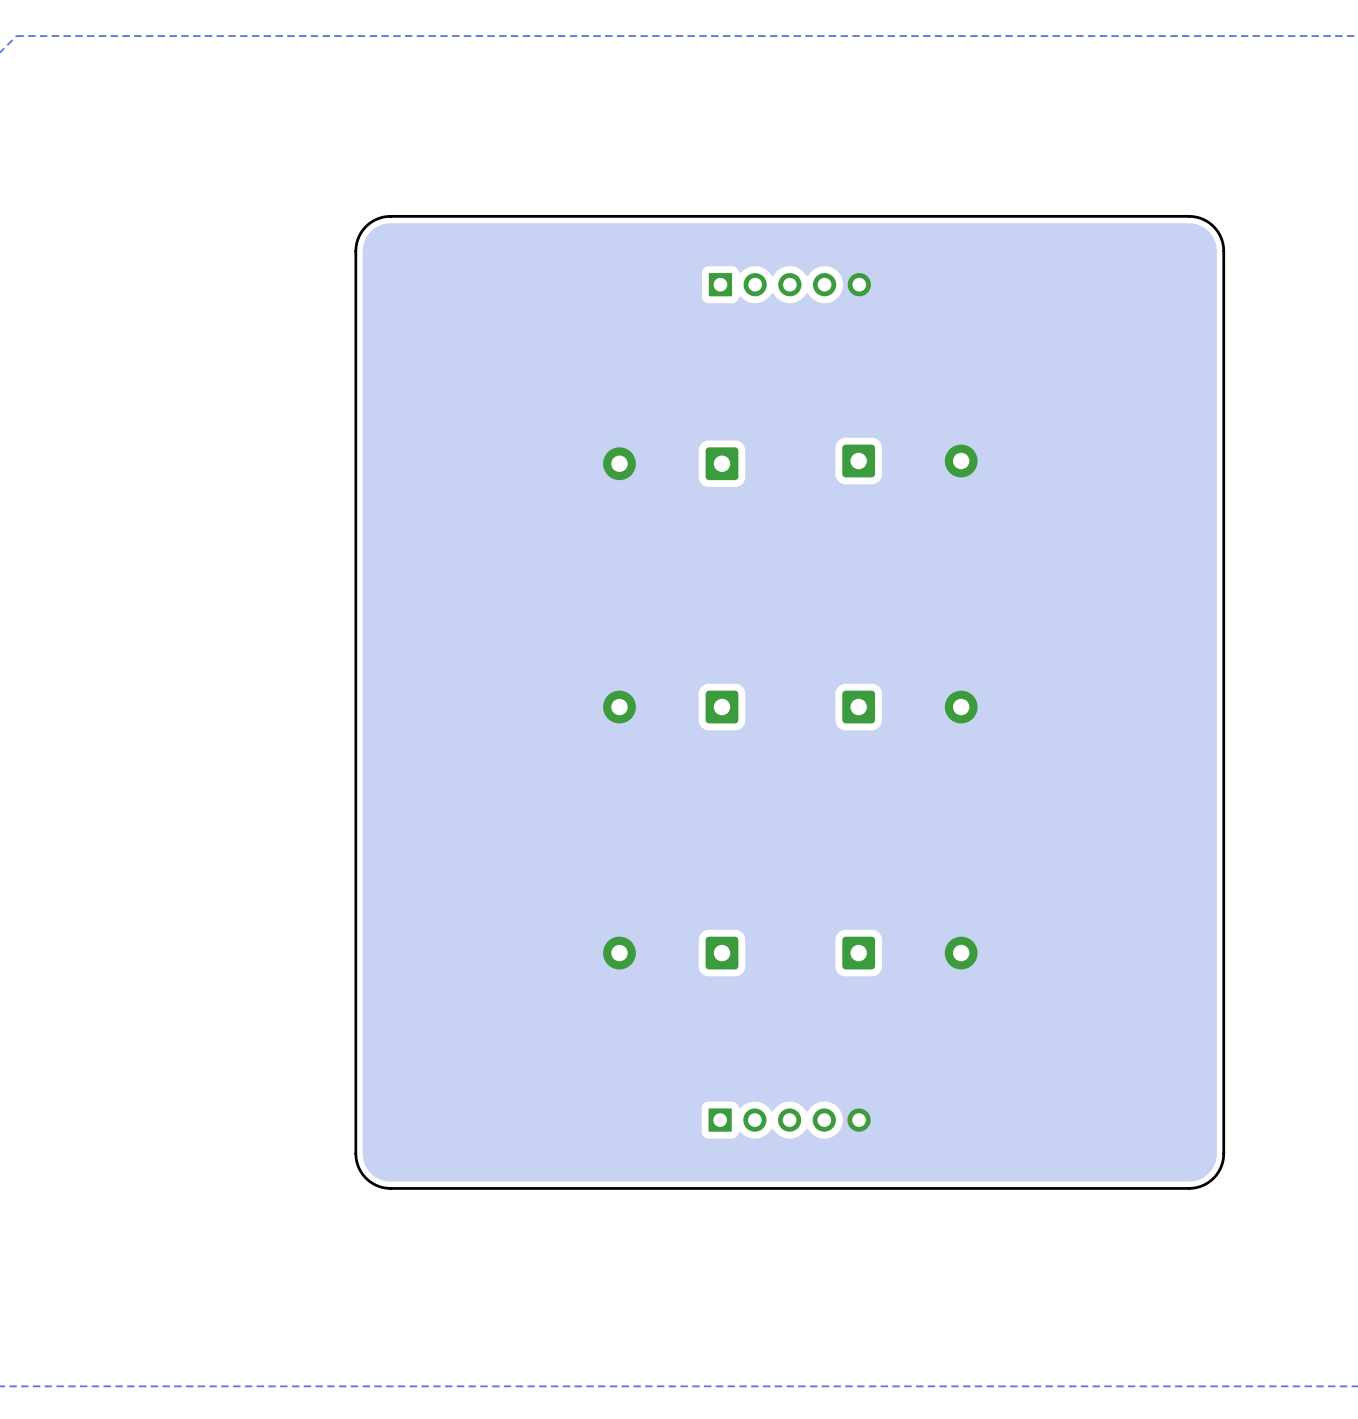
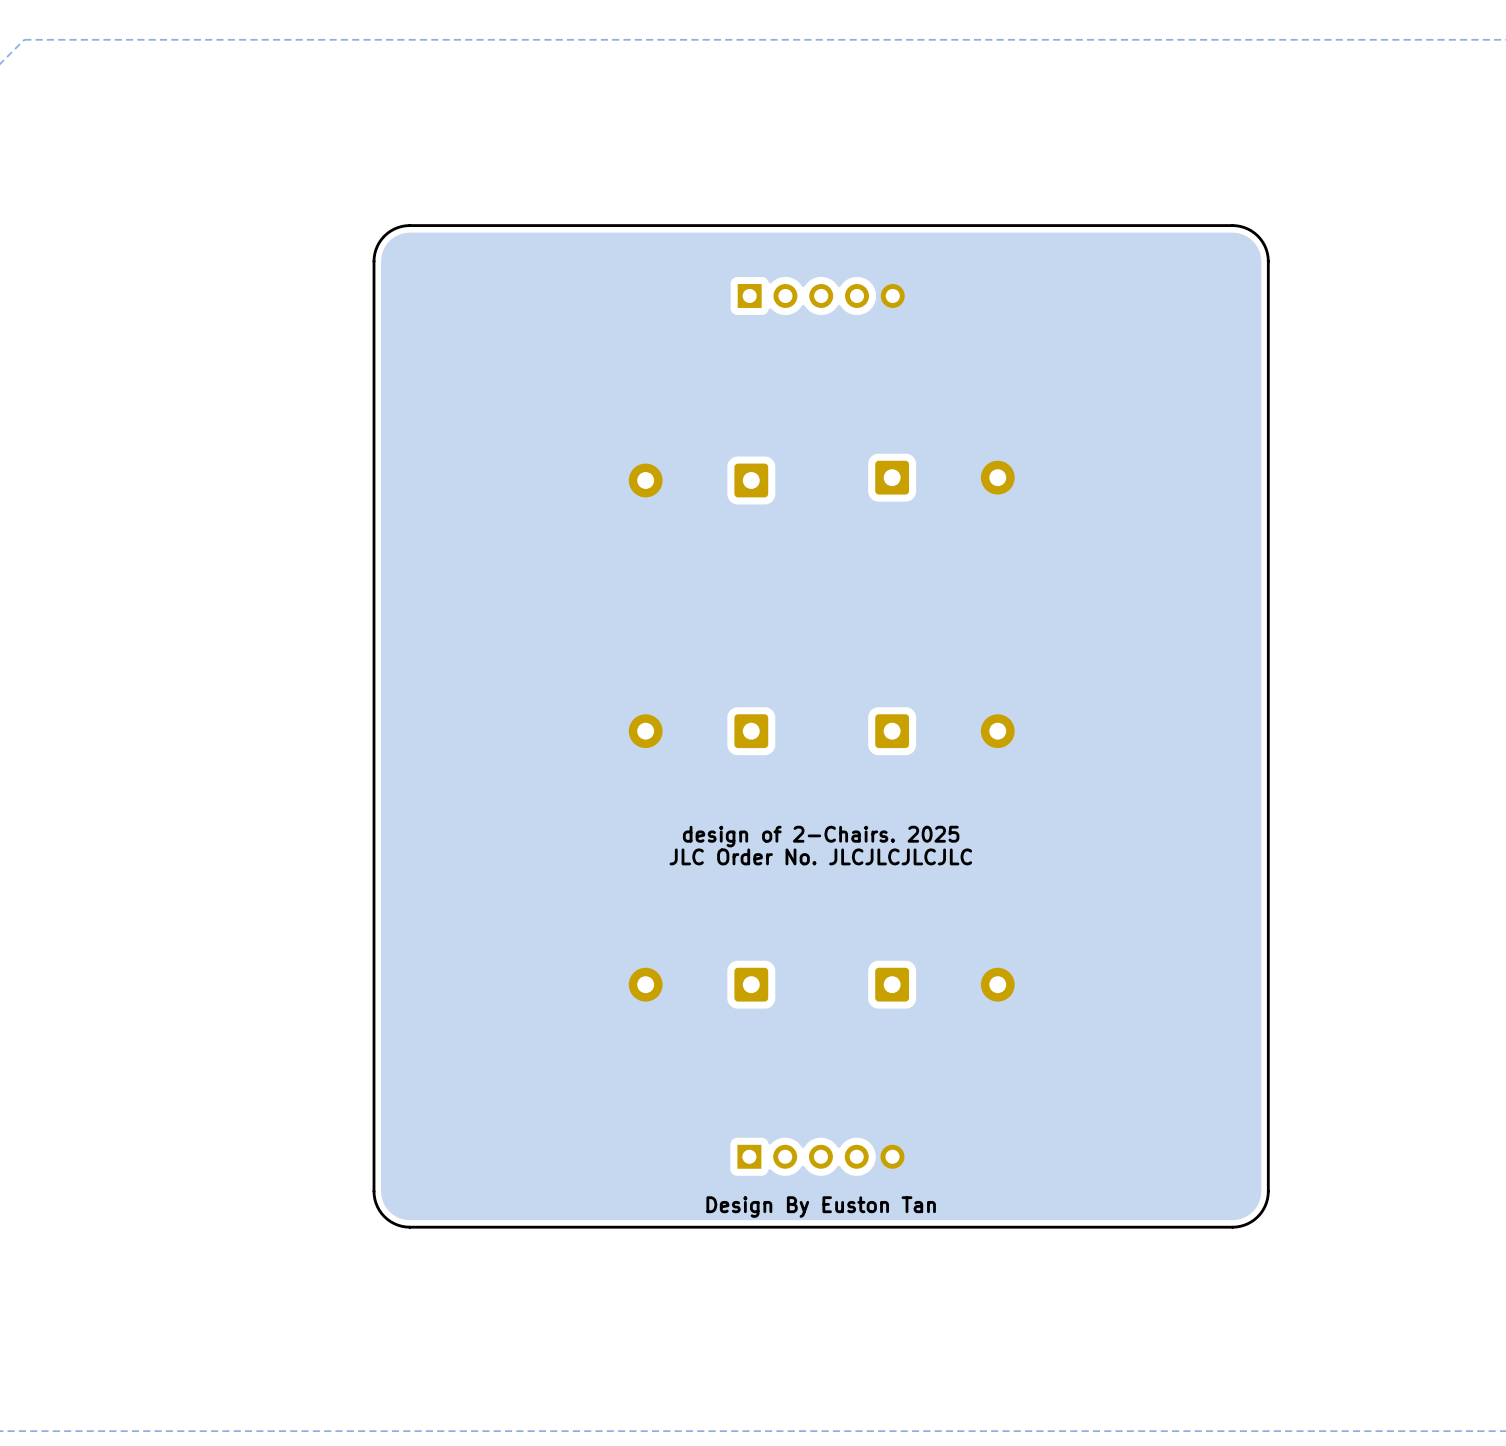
text: none -> design of 2-Chairs. 2025 (821, 836)
text: none -> JLC Order No. JLCJLCJLCJLC (820, 856)
text: none -> Design By Euston Tan (821, 1207)

